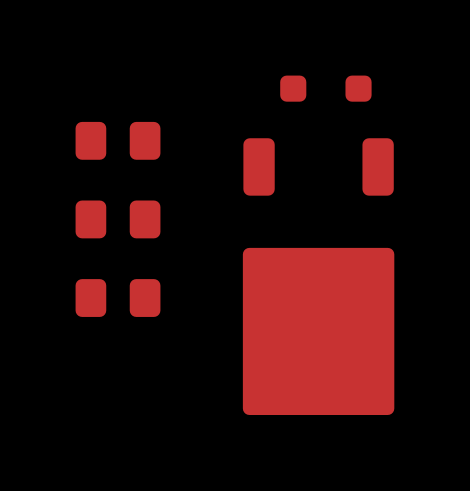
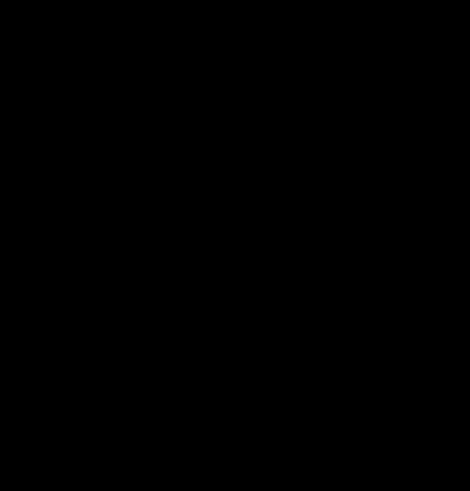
part: (325, 88) -> none
part: (118, 140) -> none
part: (118, 219) -> none
part: (318, 276) -> none
part: (118, 298) -> none

